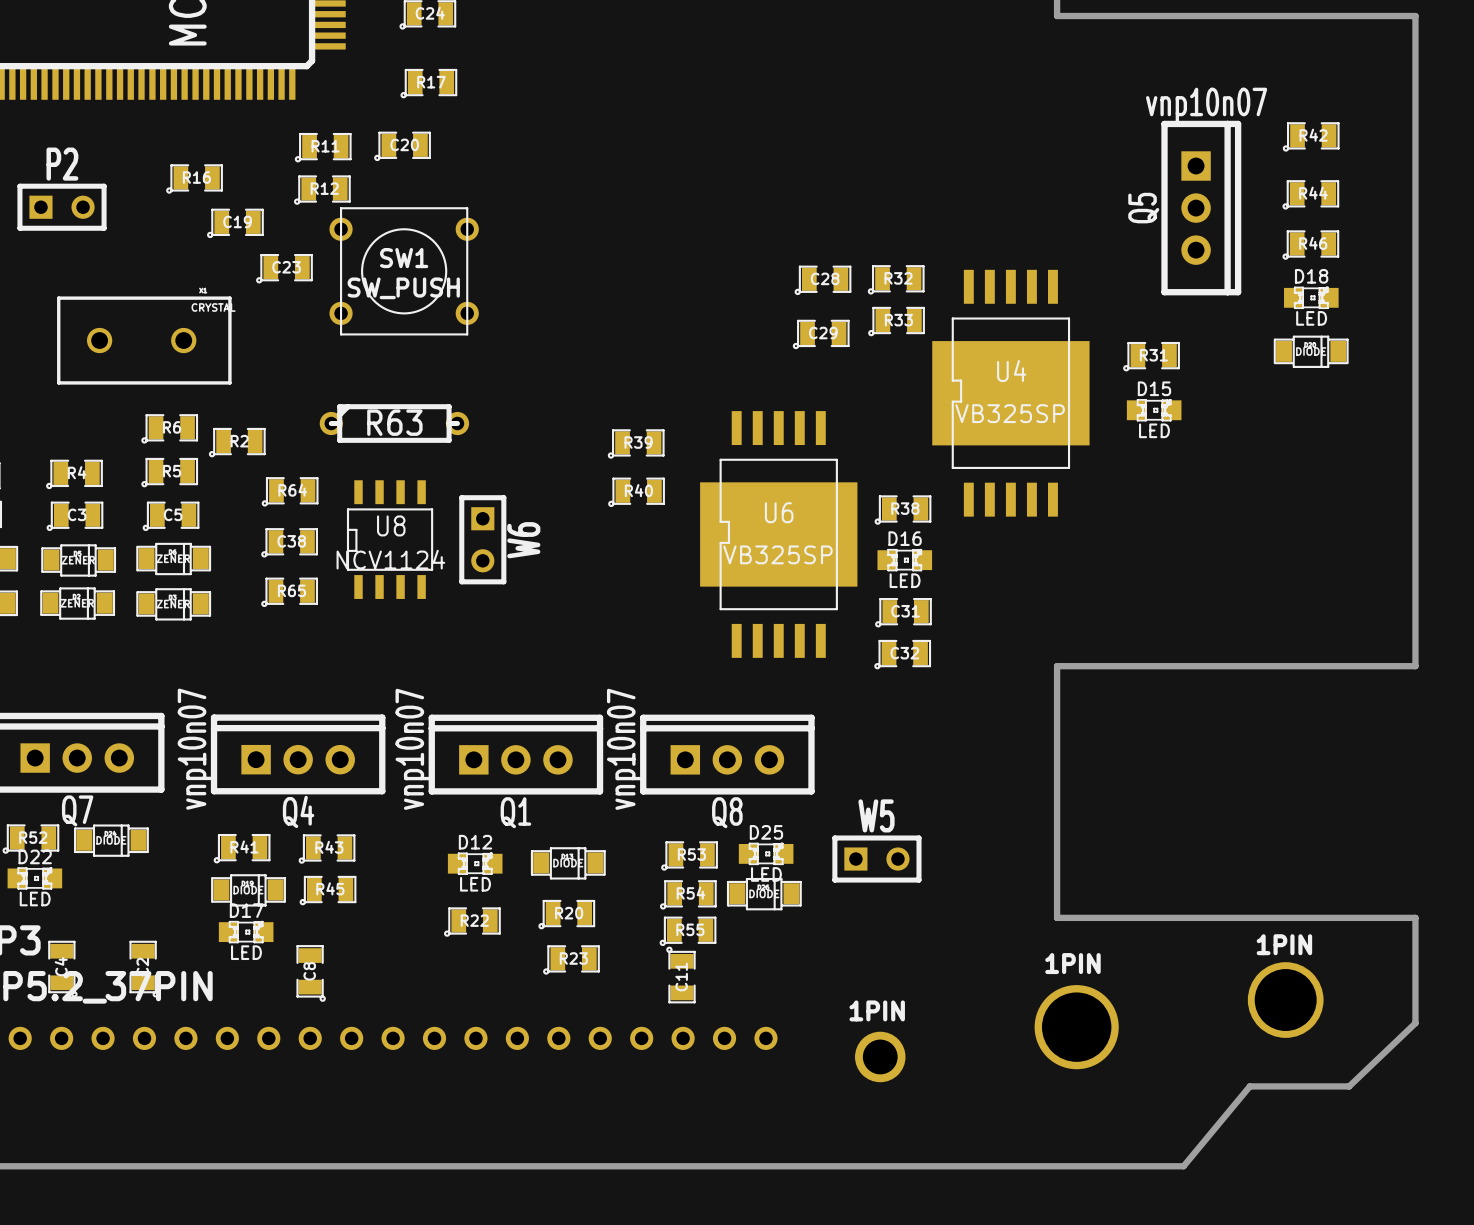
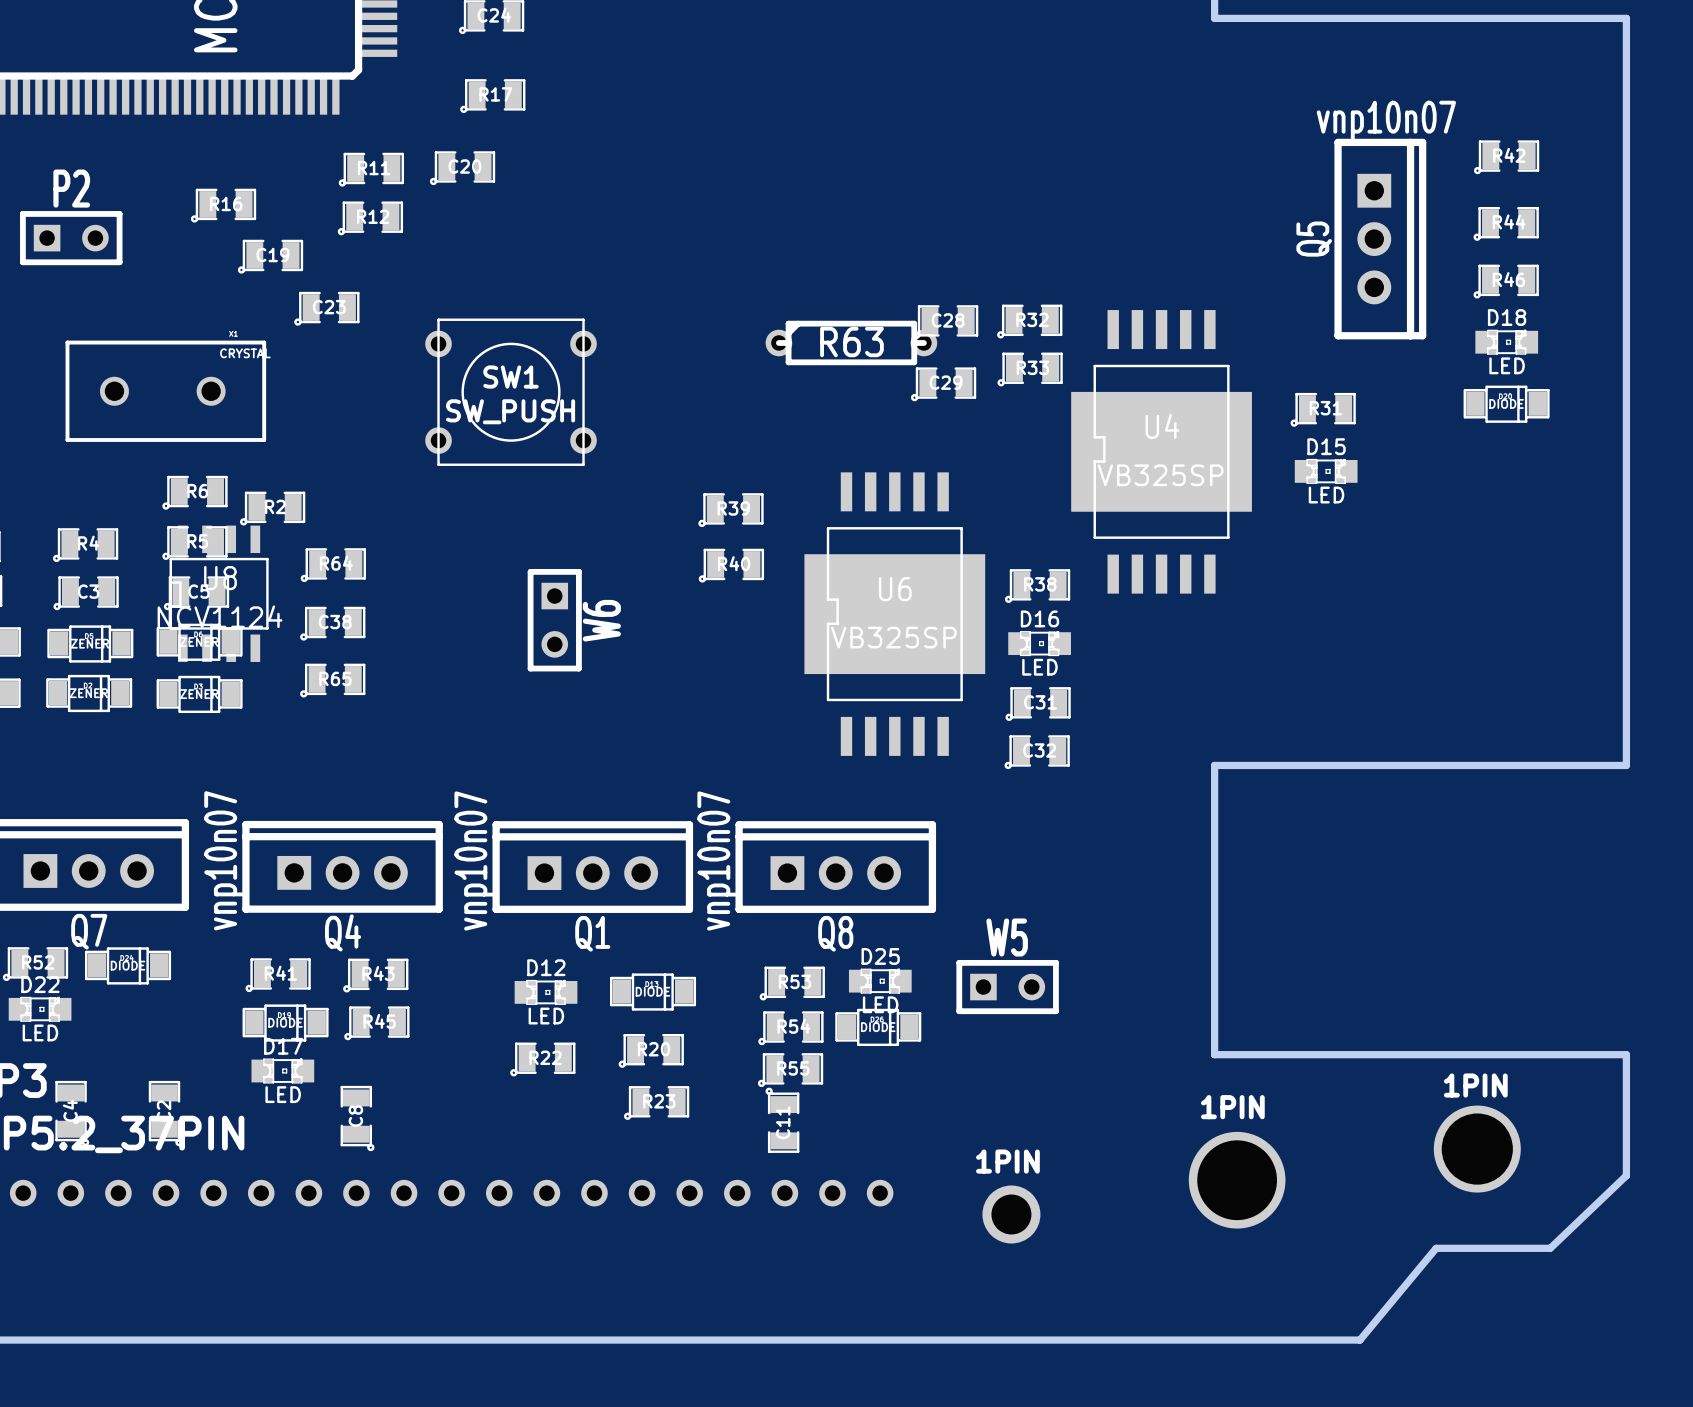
SW1 position: (404, 271) -> (511, 392)
R63 position: (394, 423) -> (851, 342)
U8 position: (390, 539) -> (219, 593)

